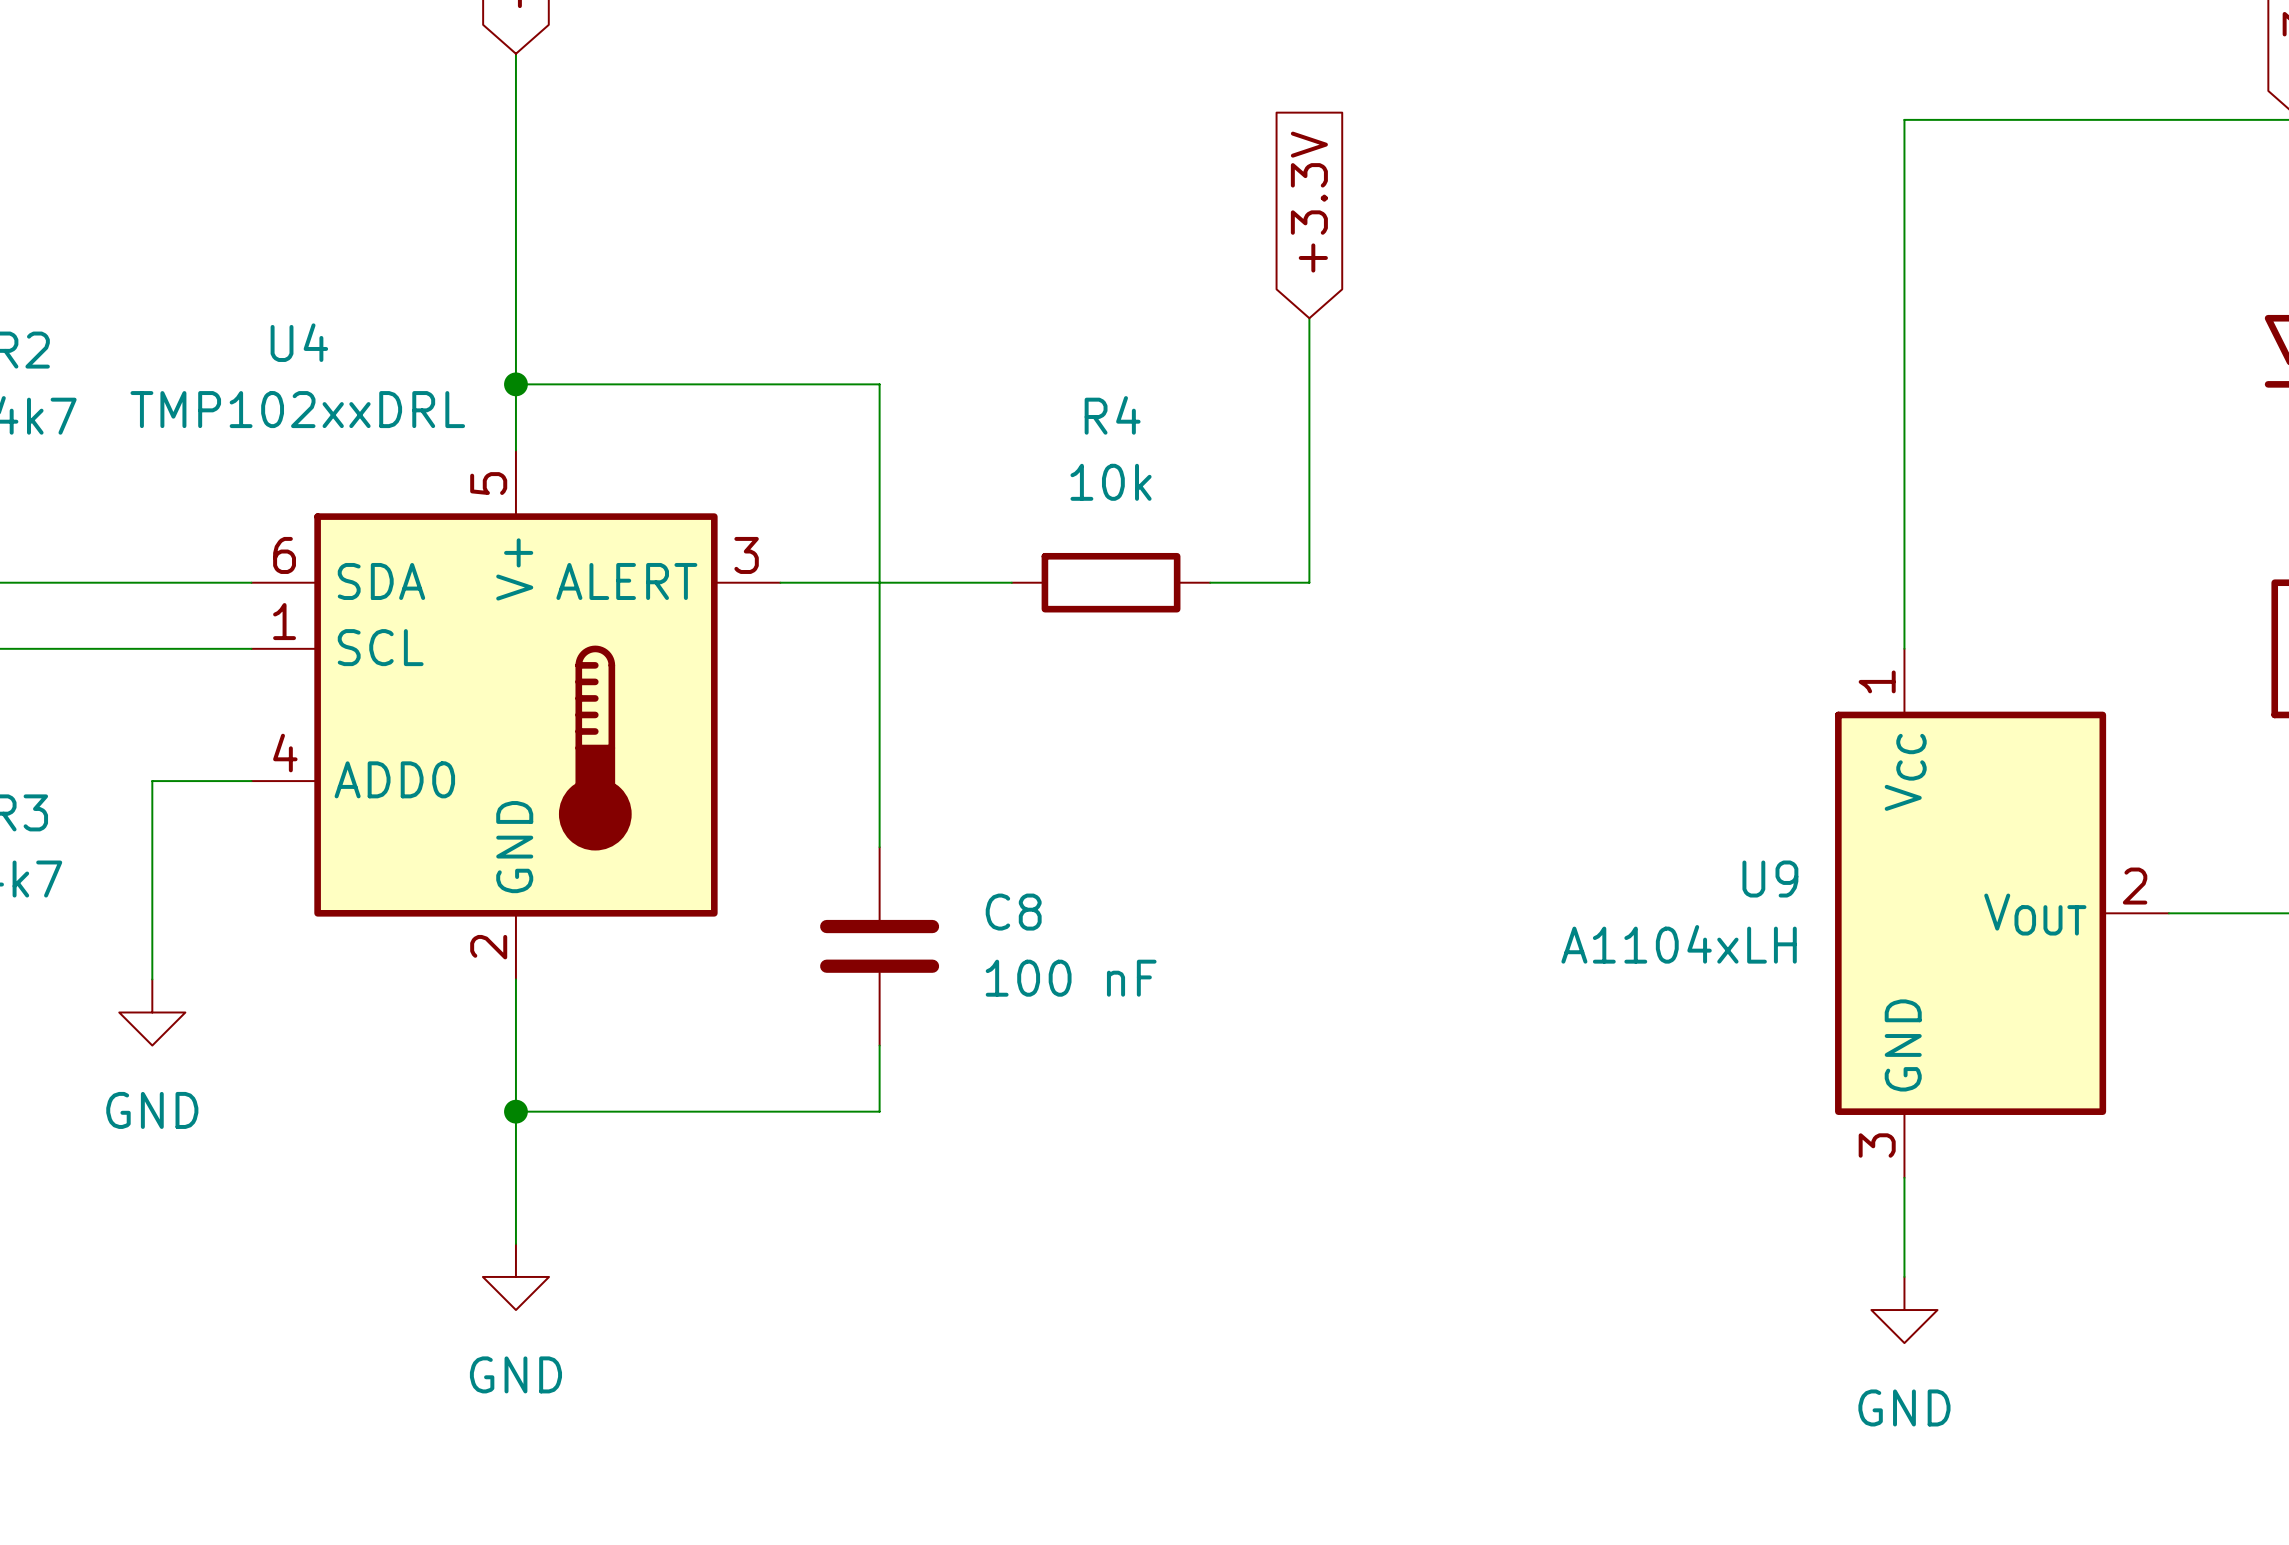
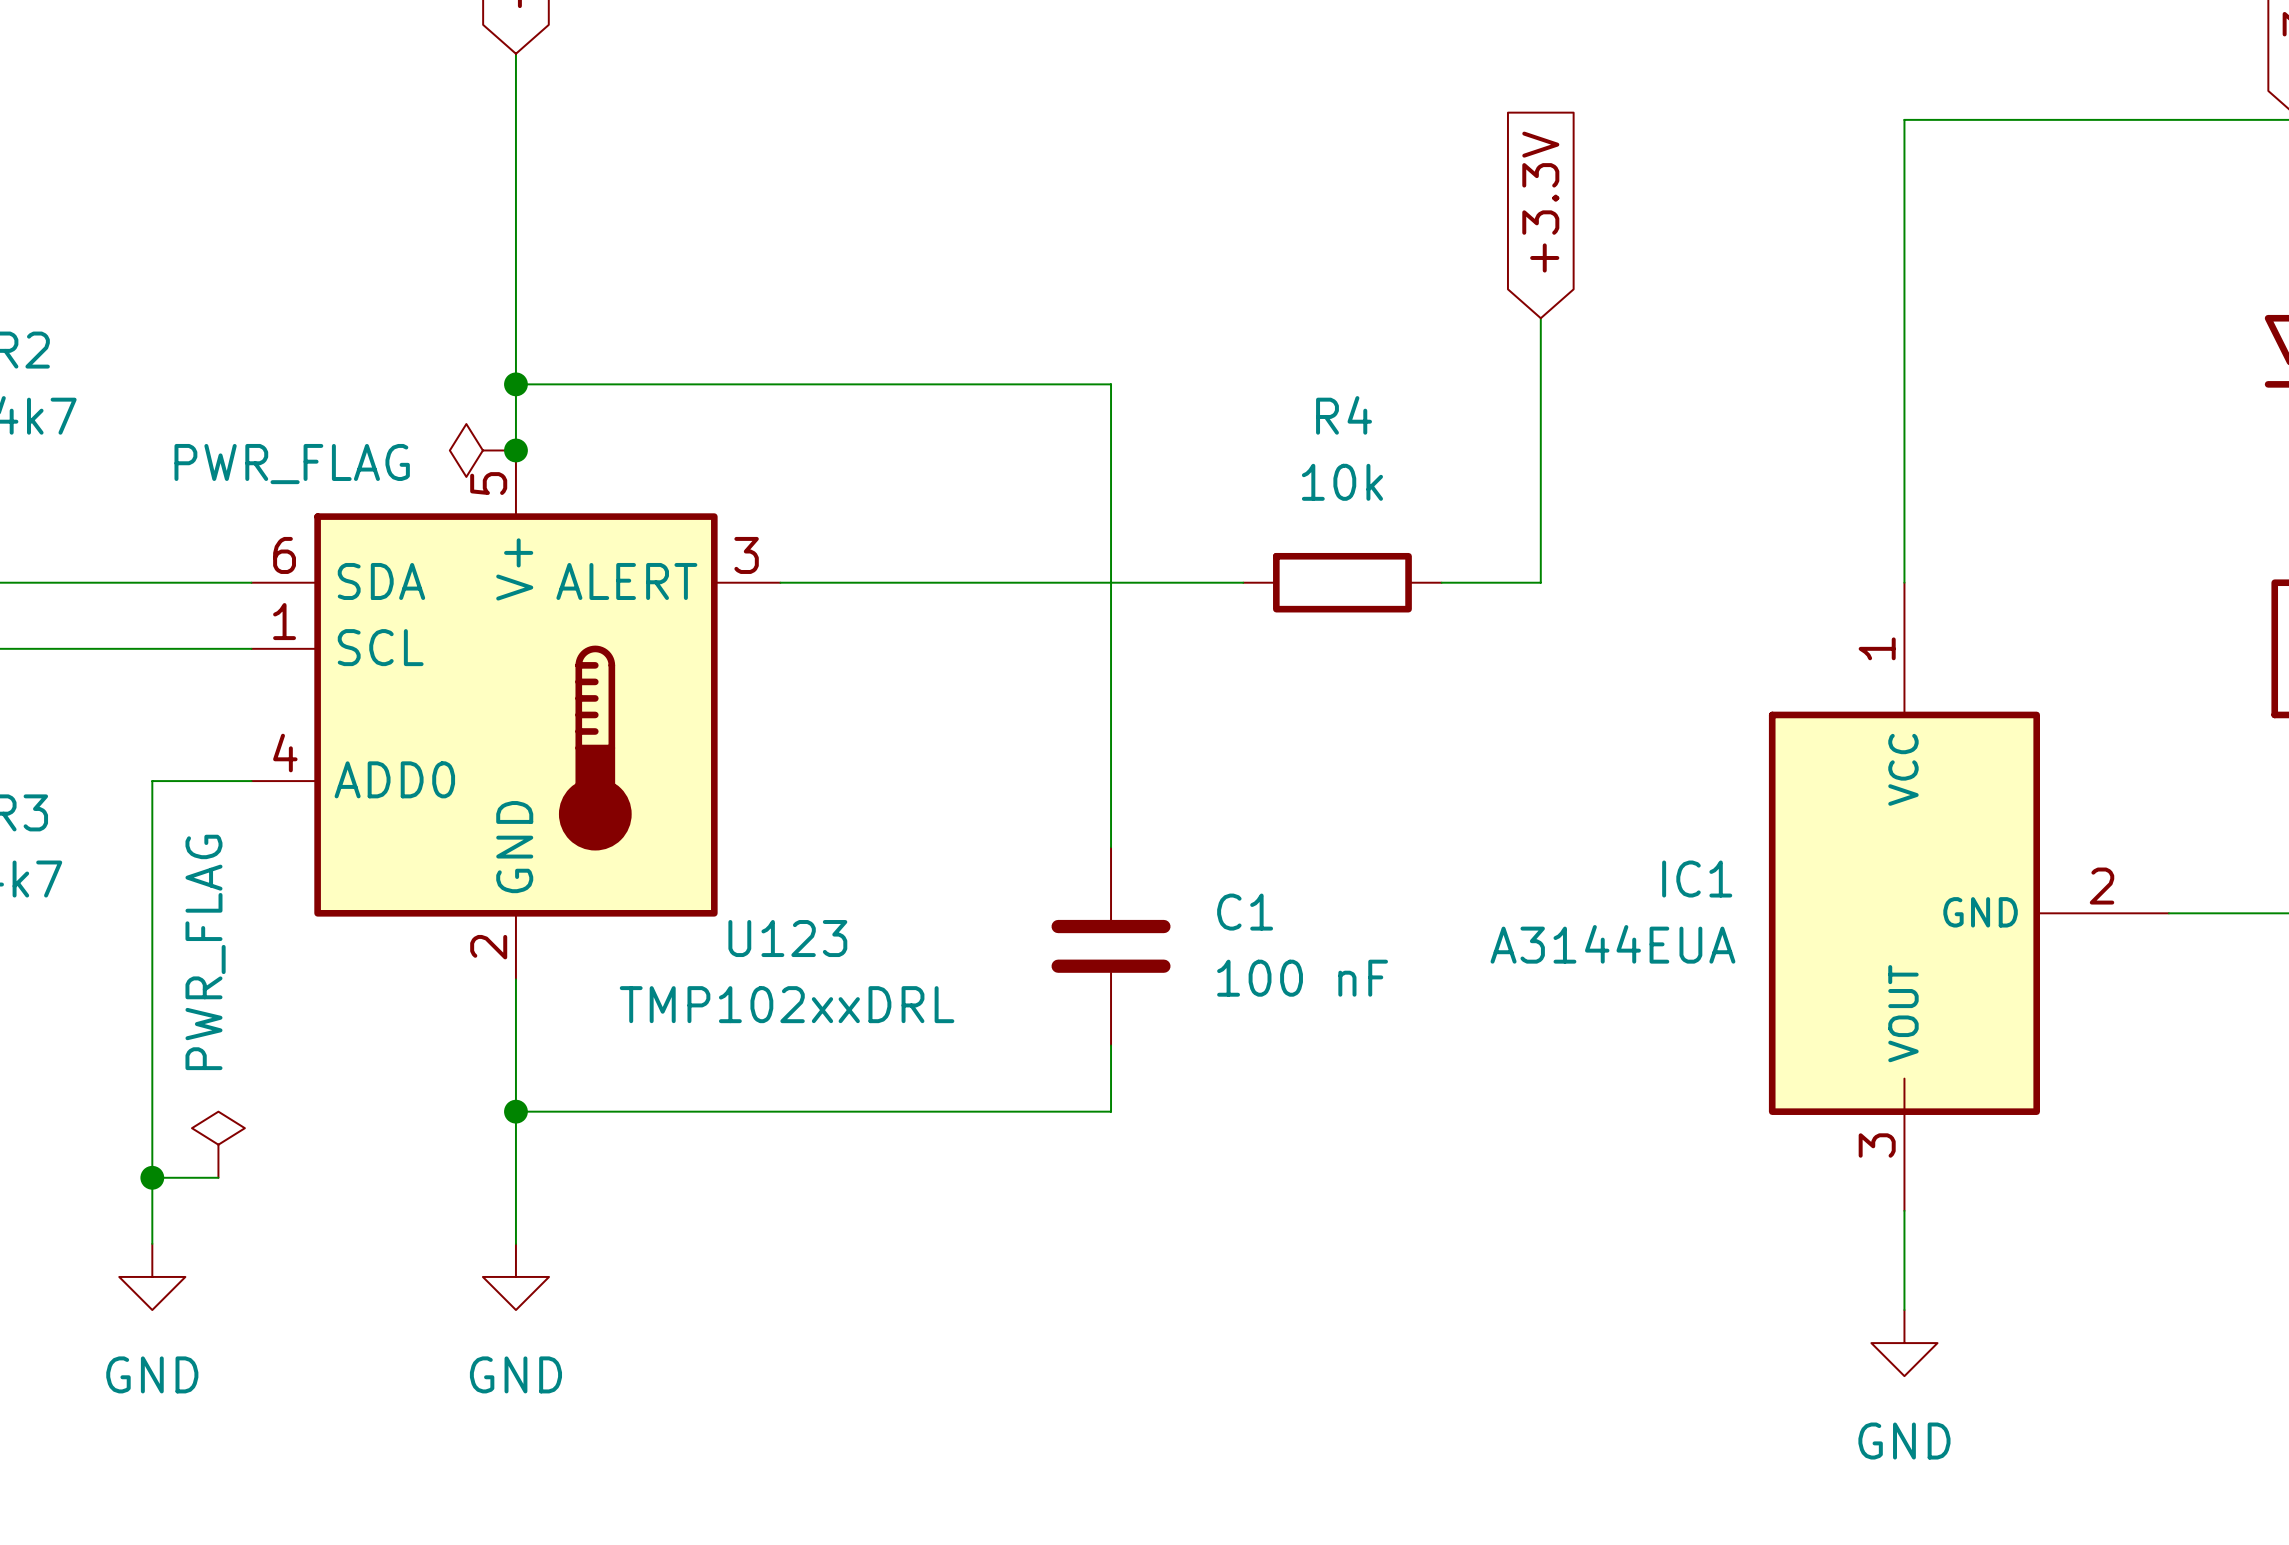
global label position: +3.3V (1309, 202) -> +3.3V (1540, 202)
wire: (1309, 318) (1309, 582) (1243, 582) -> none
wire: none -> (1540, 318) (1540, 582) (1441, 582)
U4 name: U4 (299, 342) -> U123 (787, 938)
wire: (879, 384) (879, 847) -> (879, 384) (1111, 384) (1111, 847)
U4 value position: TMP102xxDRL (297, 409) -> TMP102xxDRL (787, 1004)
power symbol: none -> PWR_FLAG (482, 450)
junction: none -> (515, 450)
wire: none -> (1011, 582) (1210, 582)
R4 position: (1111, 582) -> (1342, 582)
IC1: none -> A3144EUA (1968, 896)
U9: A1104xLH (2001, 913) -> none
C8: 100 nF (879, 946) -> none
C1: none -> 100 nF (1111, 946)
wire: none -> (152, 979) (152, 1243)
power symbol position: GND (152, 1012) -> GND (152, 1276)
wire: (879, 1045) (879, 1111) -> (1111, 1045) (1111, 1111) (879, 1111)
power symbol: none -> PWR_FLAG (218, 1144)
wire: none -> (152, 1177) (218, 1177)
junction: none -> (152, 1177)
power symbol position: GND (1904, 1310) -> GND (1904, 1343)

